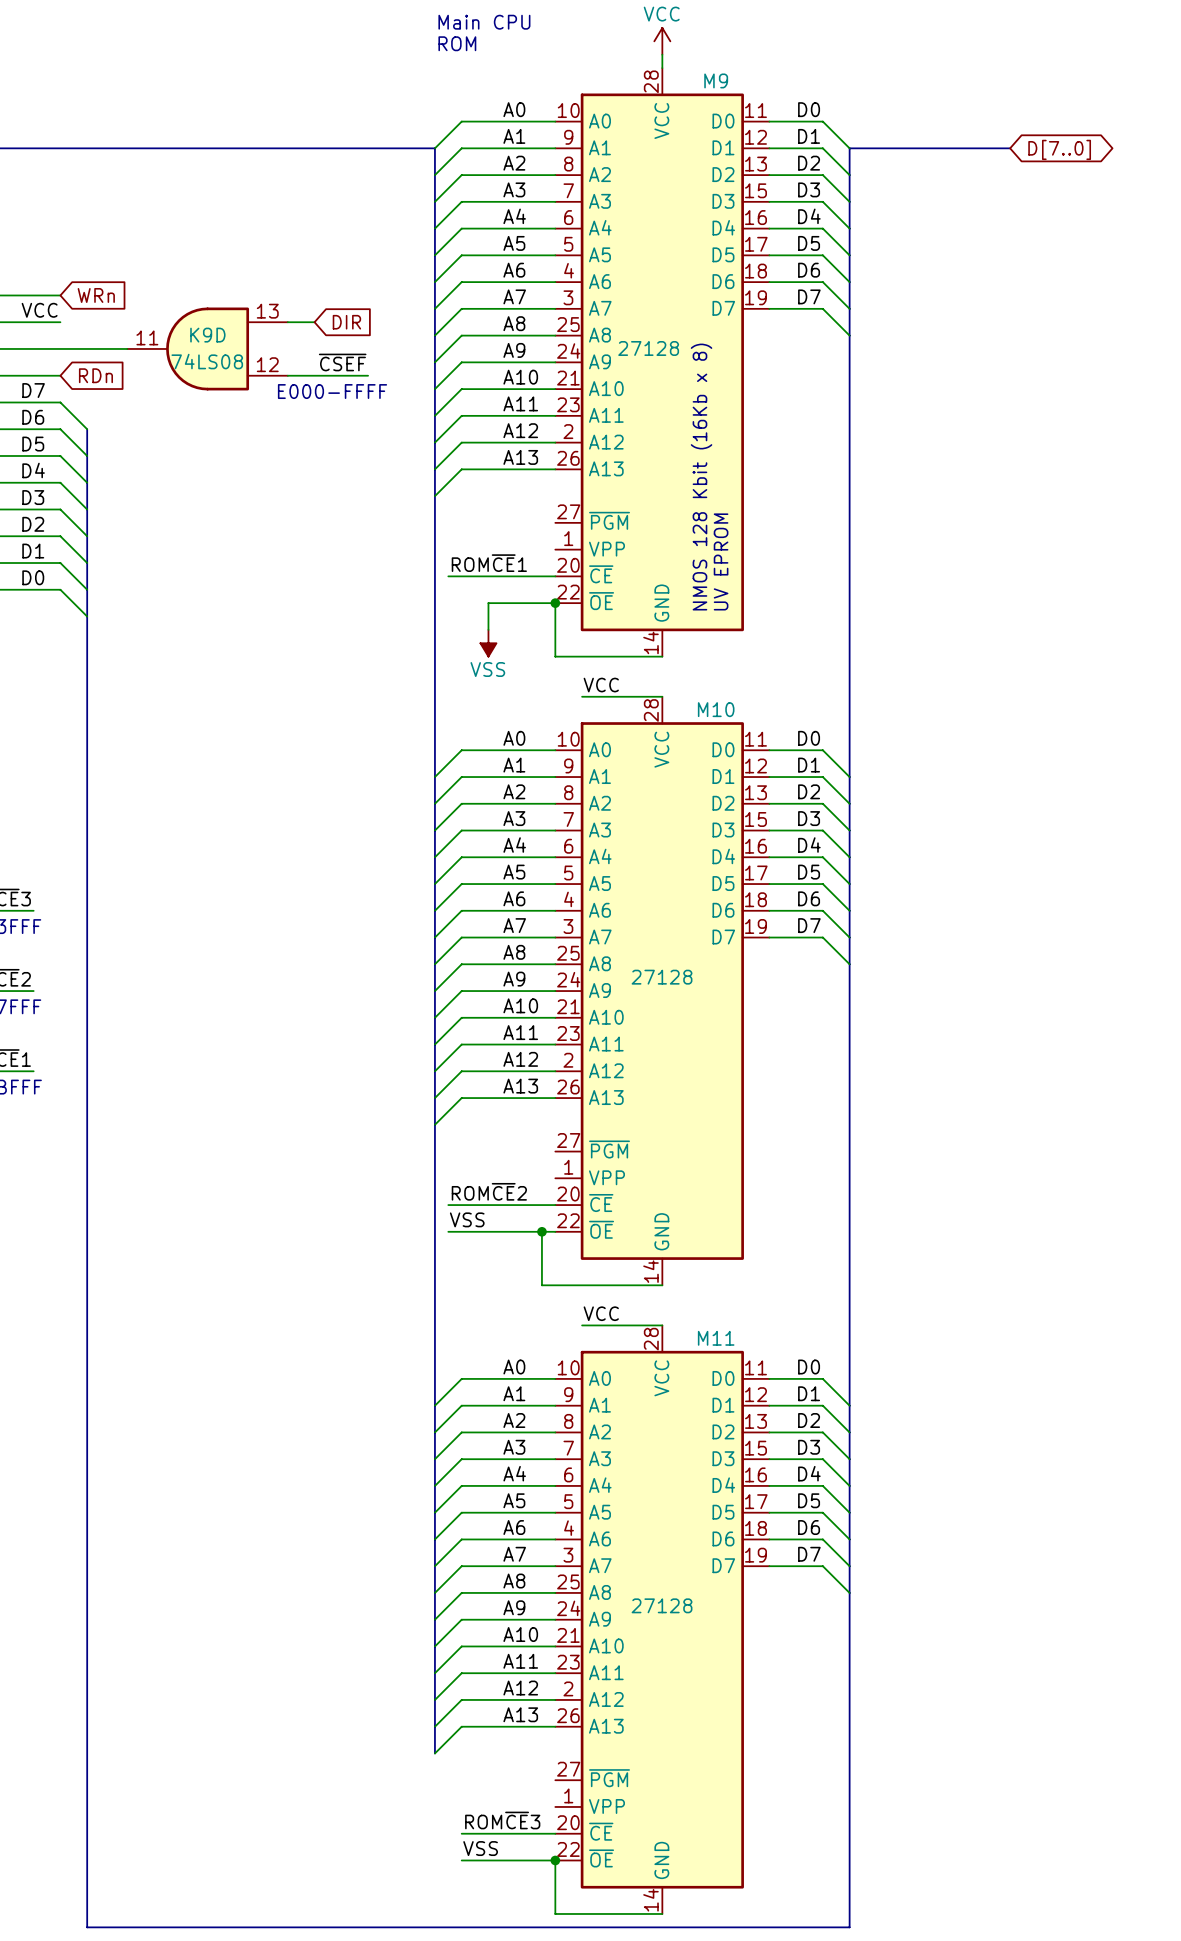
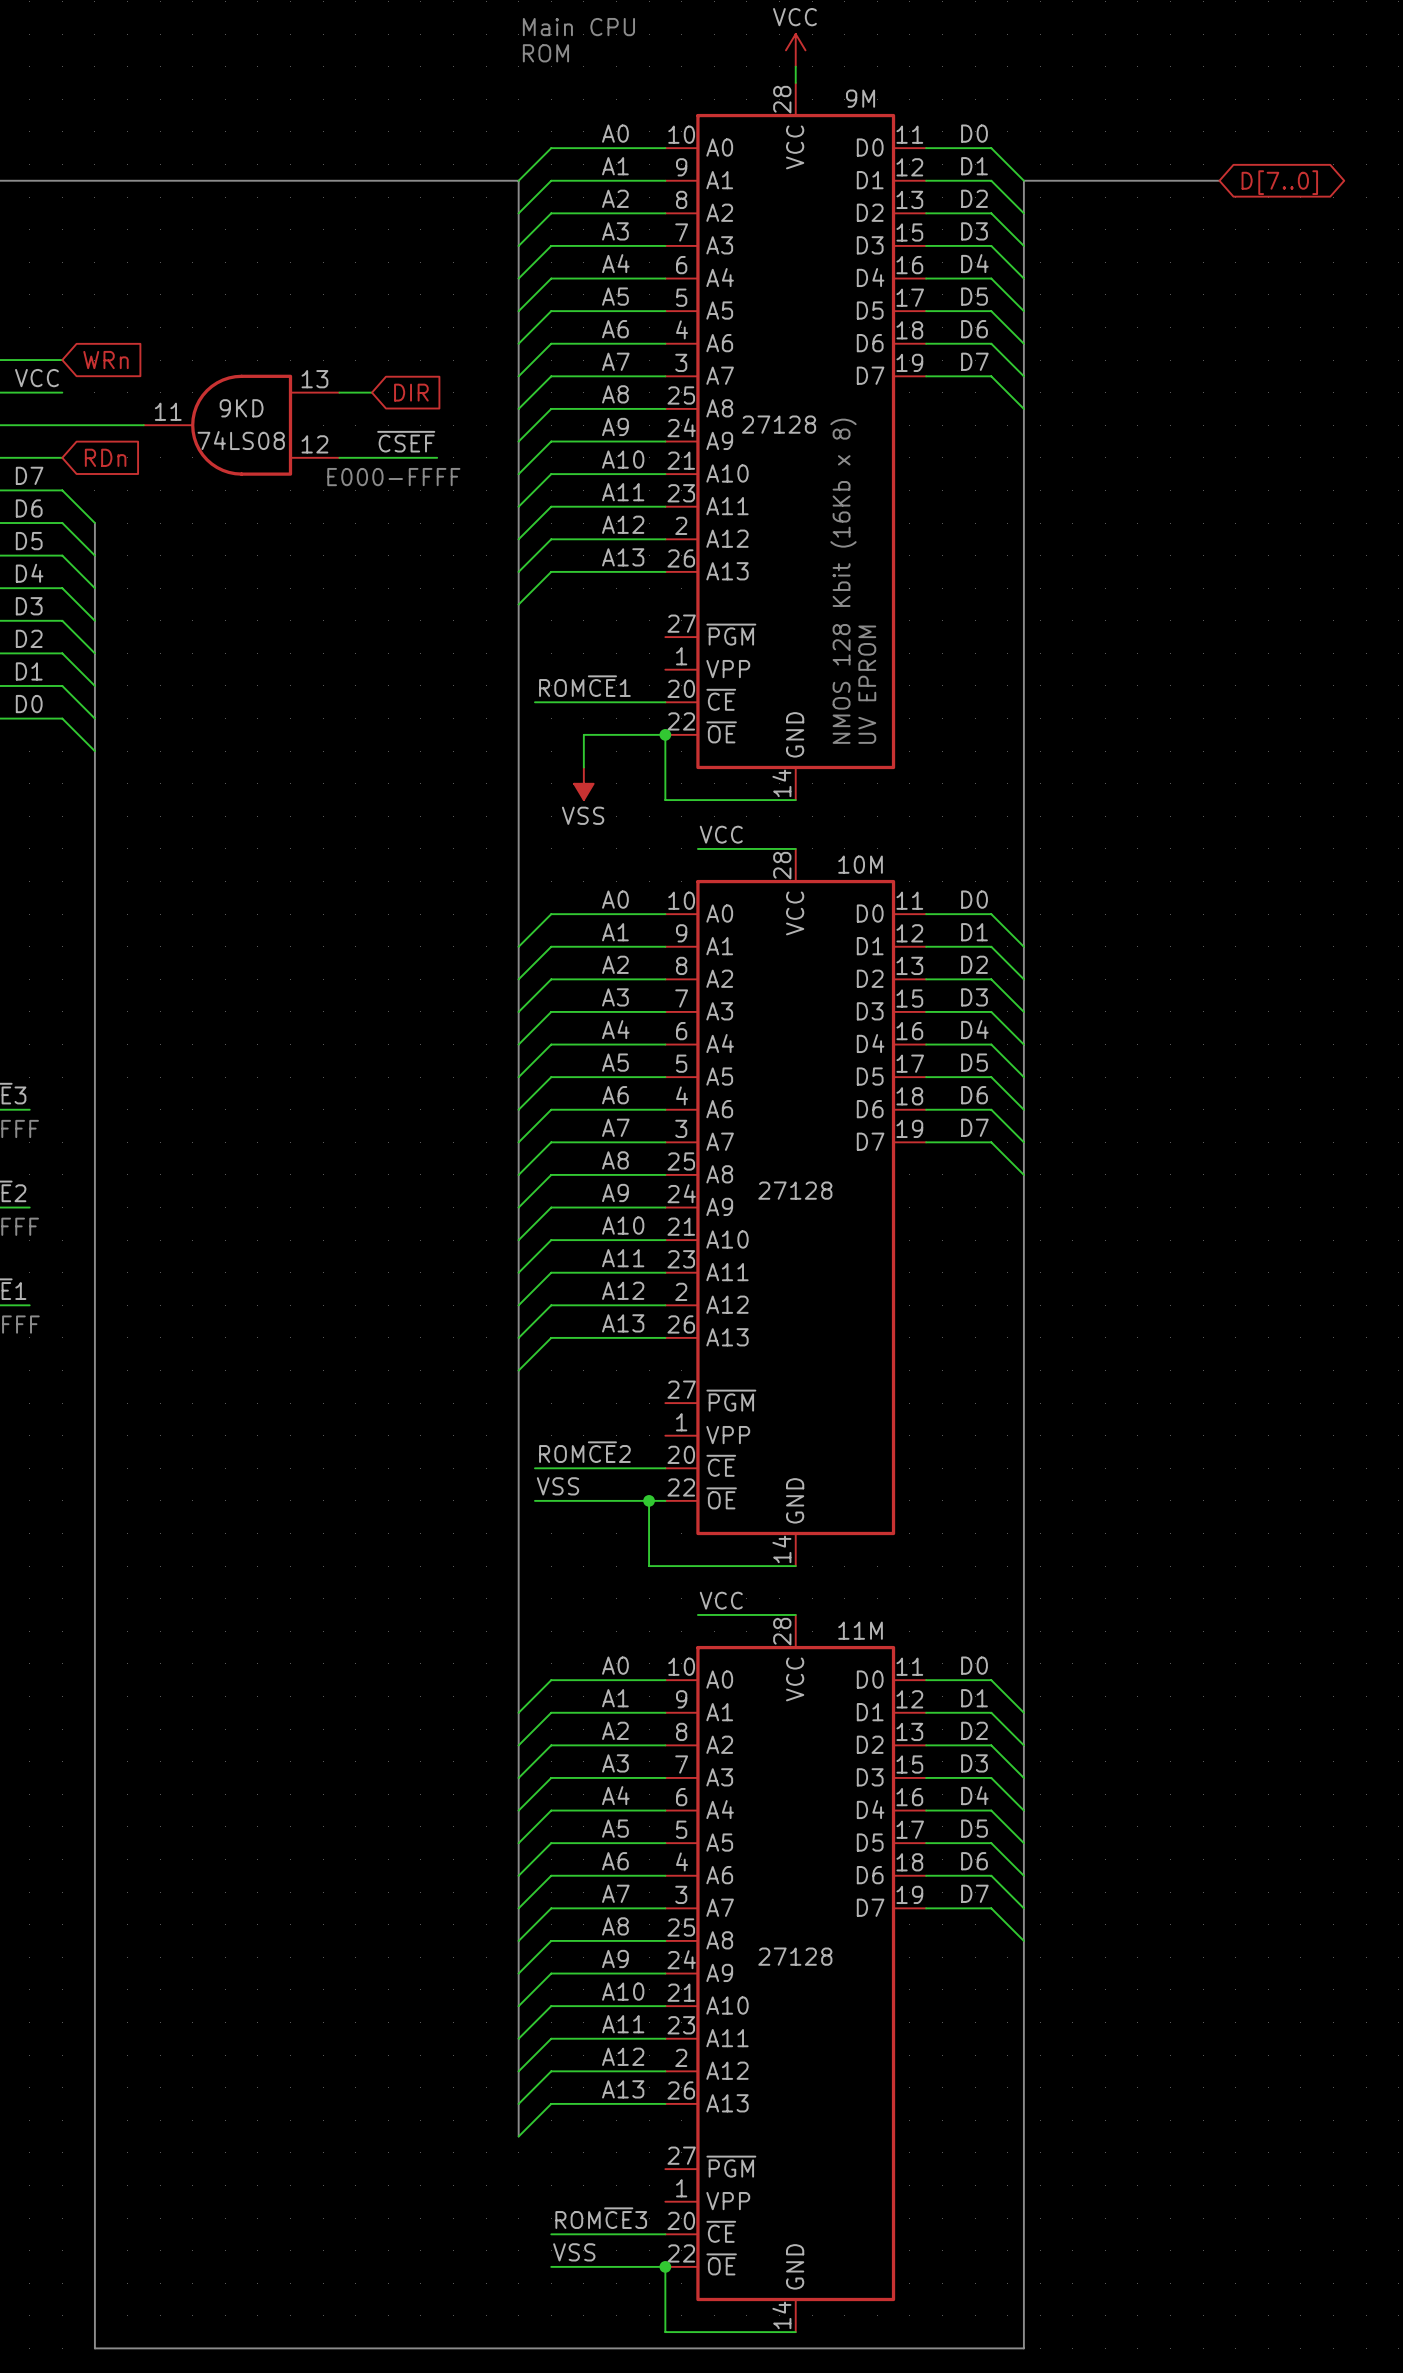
M9 name: M9 (716, 80) -> 9M (860, 98)
K9D name: K9D (207, 335) -> 9KD (241, 408)
M10 name: M10 (716, 709) -> 10M (860, 864)
M11 name: M11 (716, 1338) -> 11M (860, 1630)

